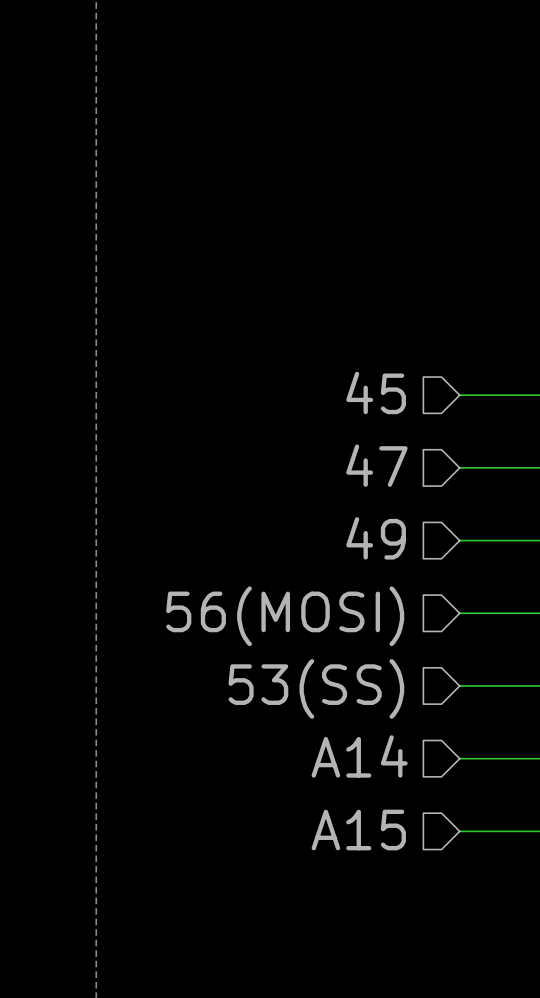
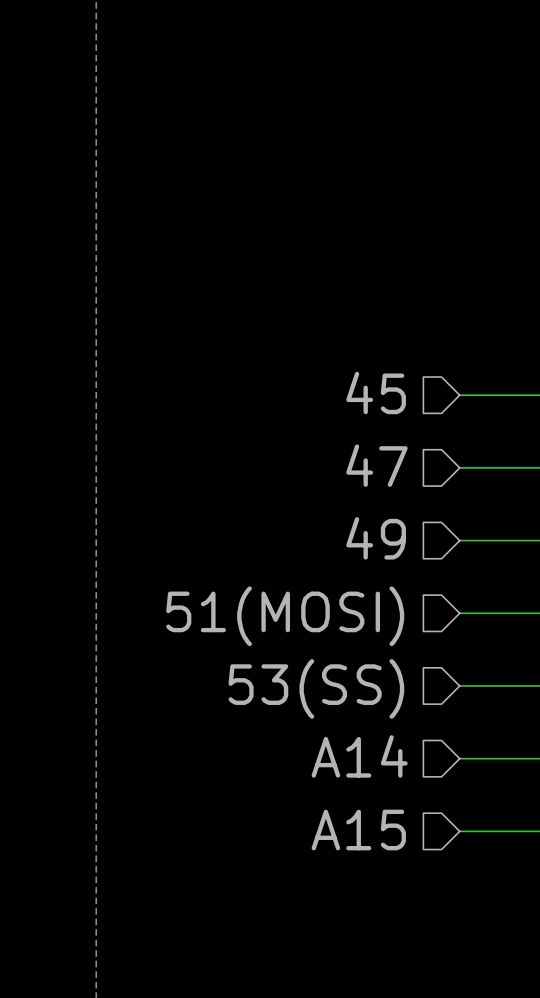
hierarchical label: 56(MOSI) (285, 616) -> 51(MOSI) (285, 616)

